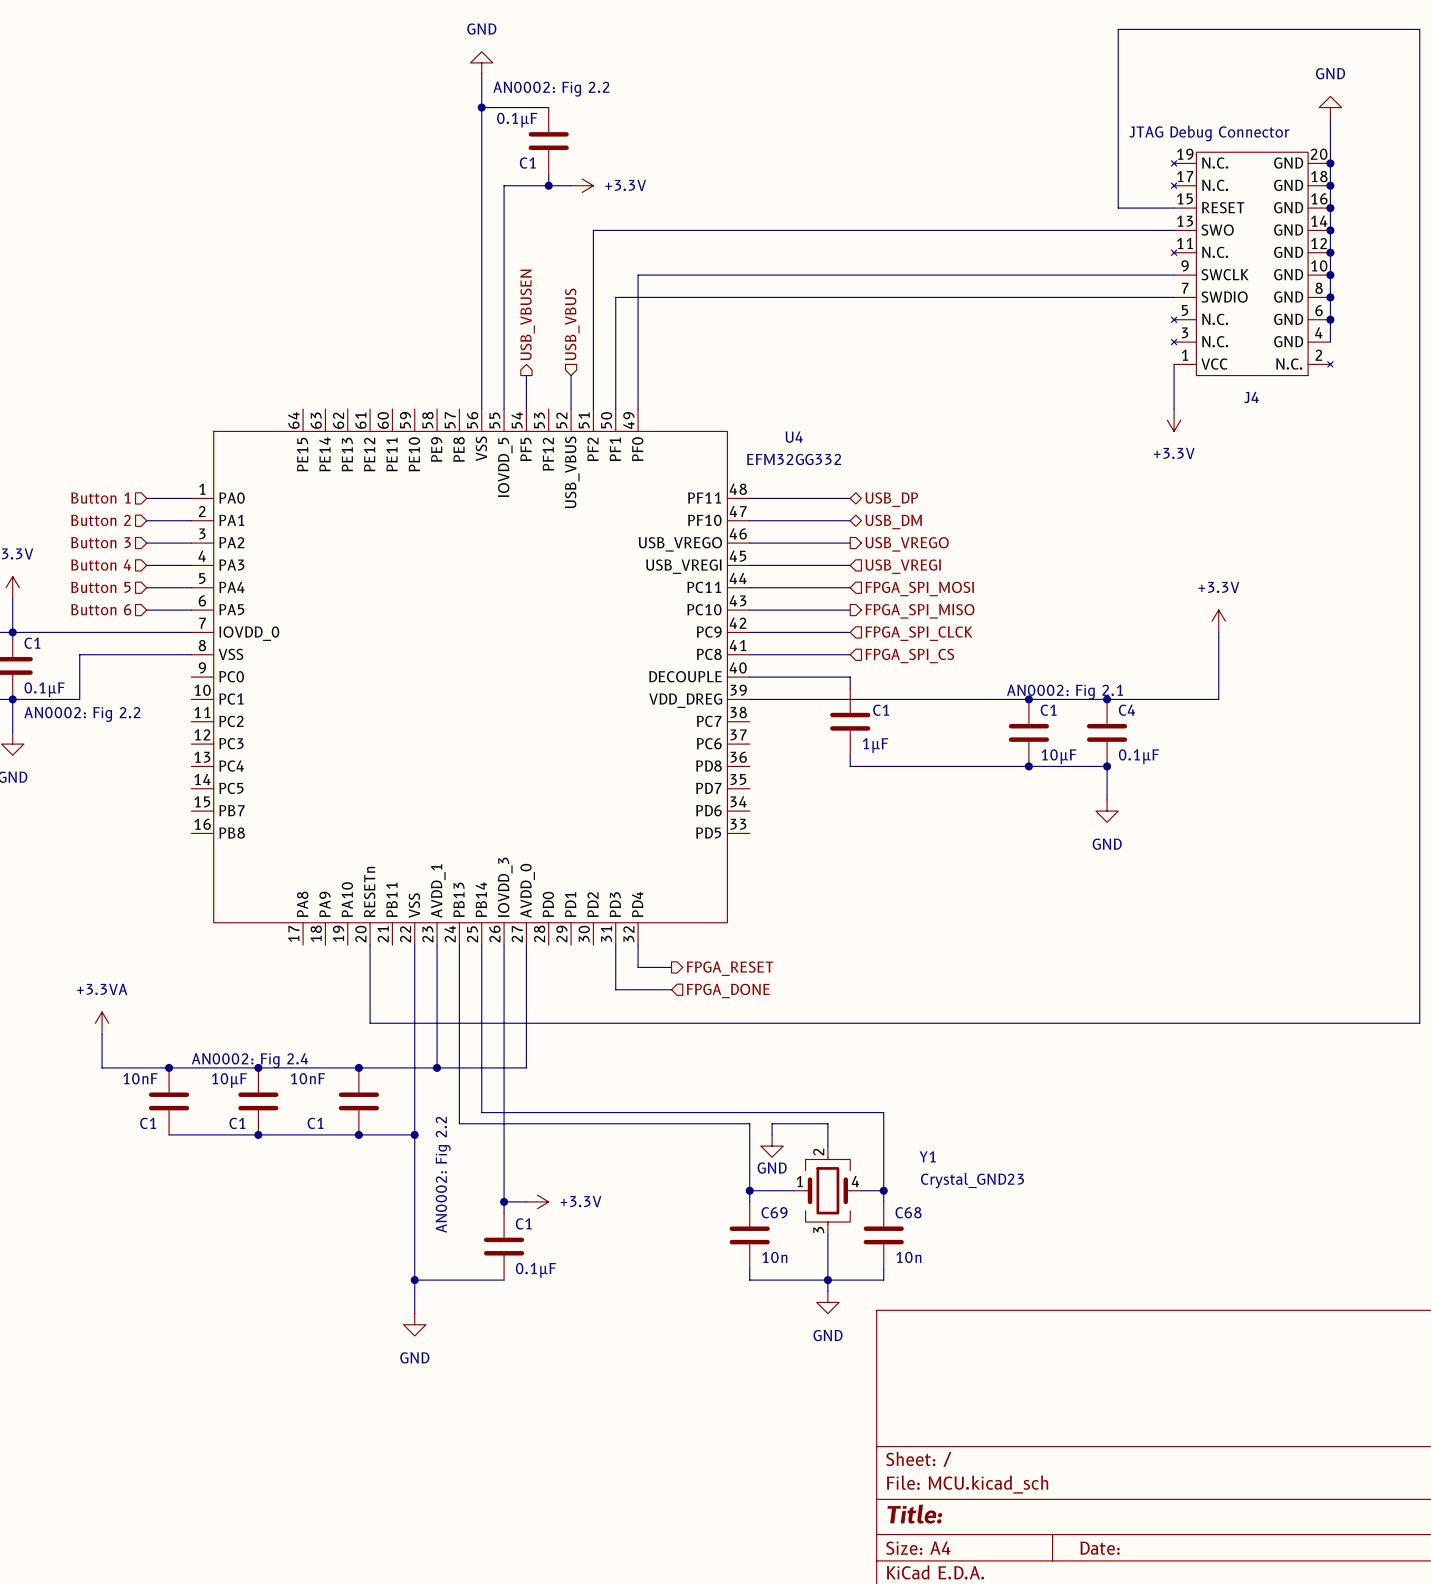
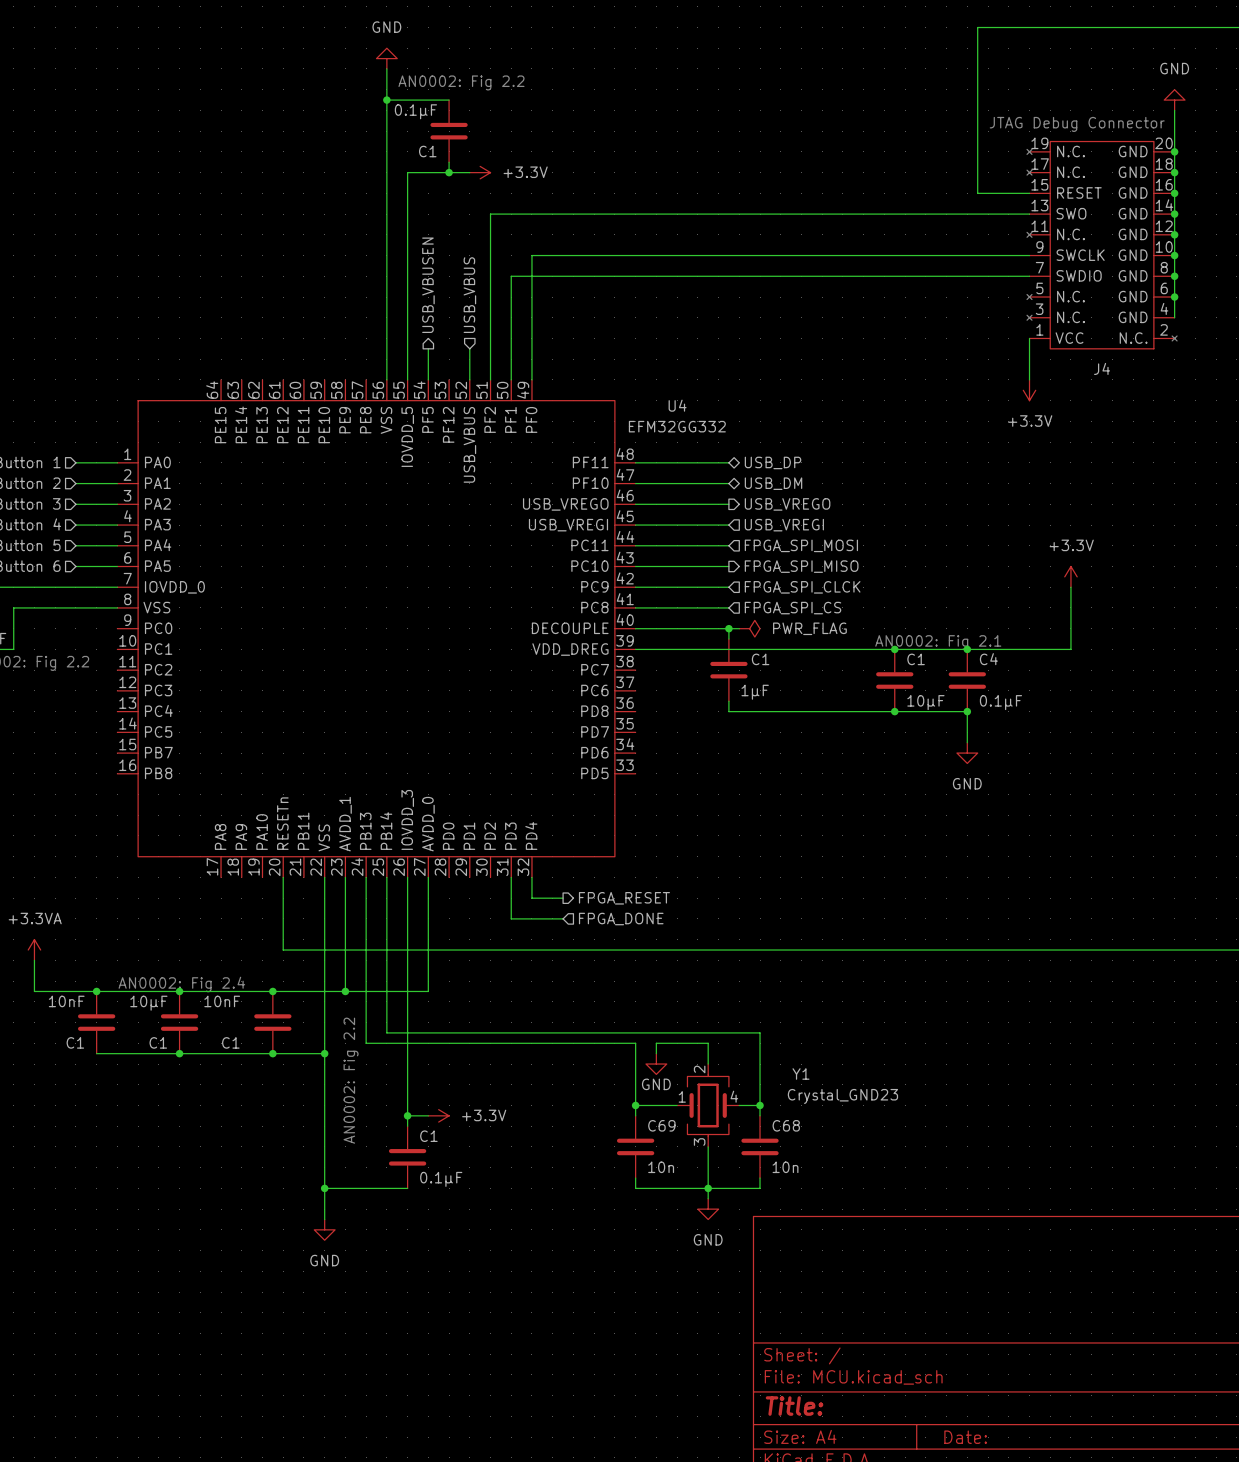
wire: none -> (728, 628) (739, 628)
junction: none -> (728, 628)
power symbol: none -> PWR_FLAG (749, 628)

